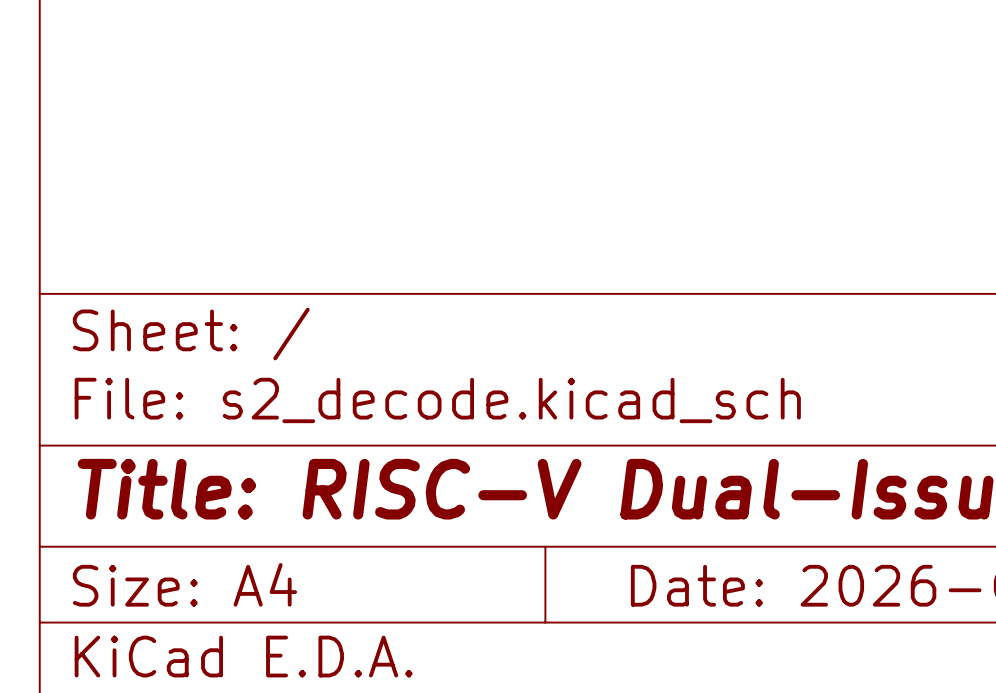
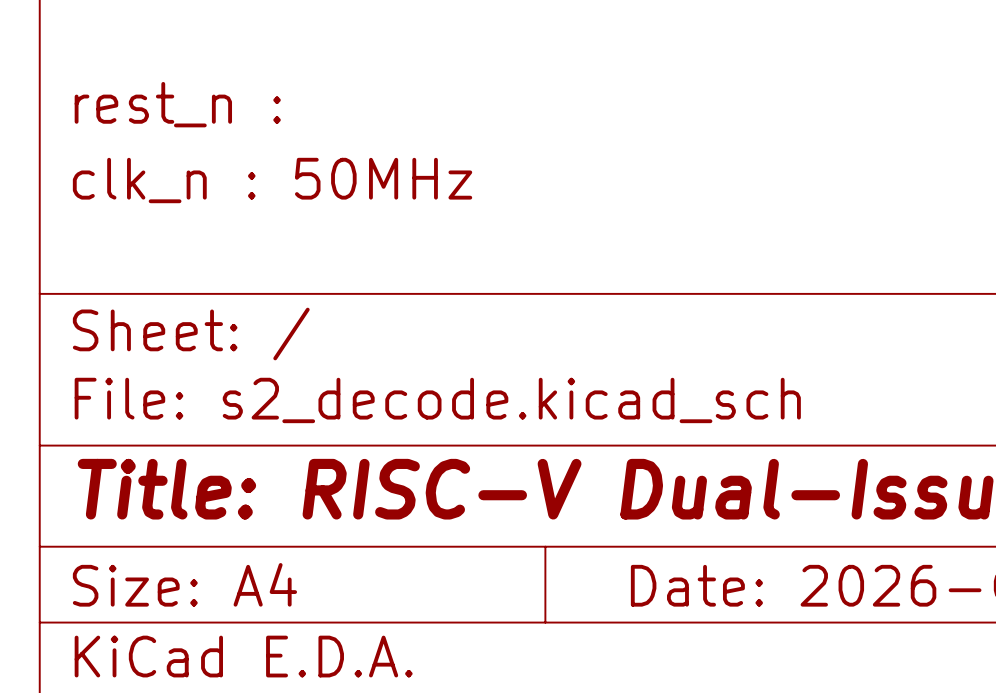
title block: none -> rest_n : (177, 104)
title block: none -> clk_n : 50MHz (272, 180)

